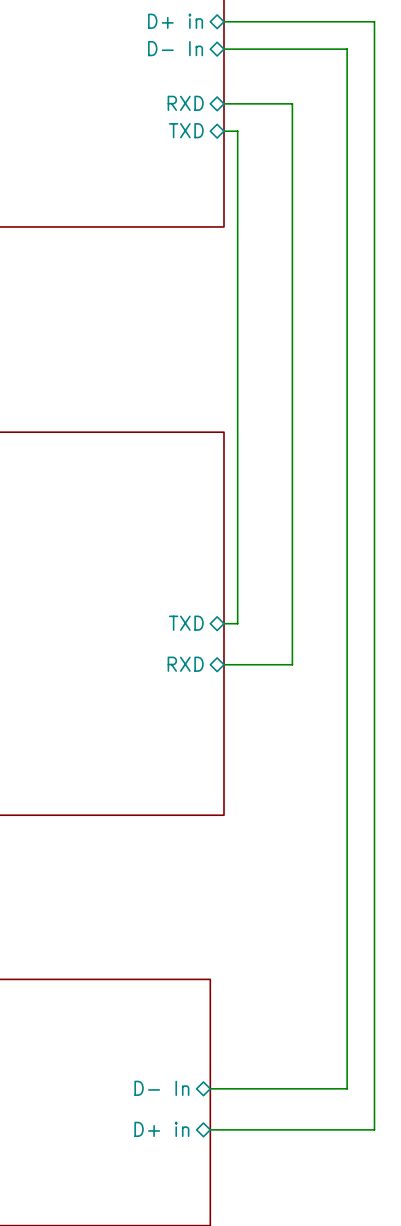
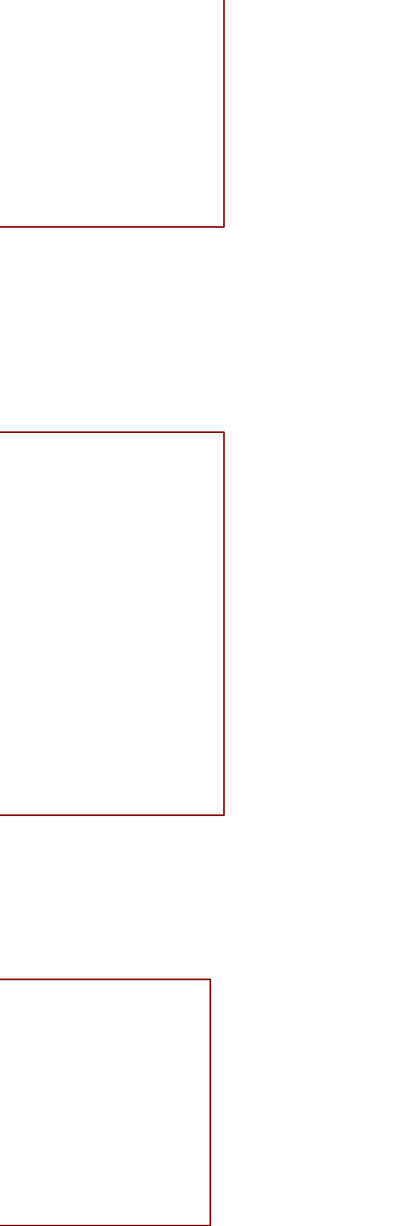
sheet pin: D+ in (175, 21) -> none
wire: (223, 21) (374, 21) (374, 1129) (210, 1129) -> none
sheet pin: D- In (175, 48) -> none
wire: (223, 49) (347, 49) (347, 1088) (210, 1088) -> none
sheet pin: RXD (185, 103) -> none
wire: (223, 103) (292, 103) (292, 664) (223, 664) -> none
sheet pin: TXD (186, 130) -> none
wire: (223, 131) (237, 131) (237, 623) (223, 623) -> none
sheet pin: TXD (186, 623) -> none
sheet pin: RXD (185, 664) -> none
sheet pin: D- In (161, 1088) -> none
sheet pin: D+ in (161, 1129) -> none

